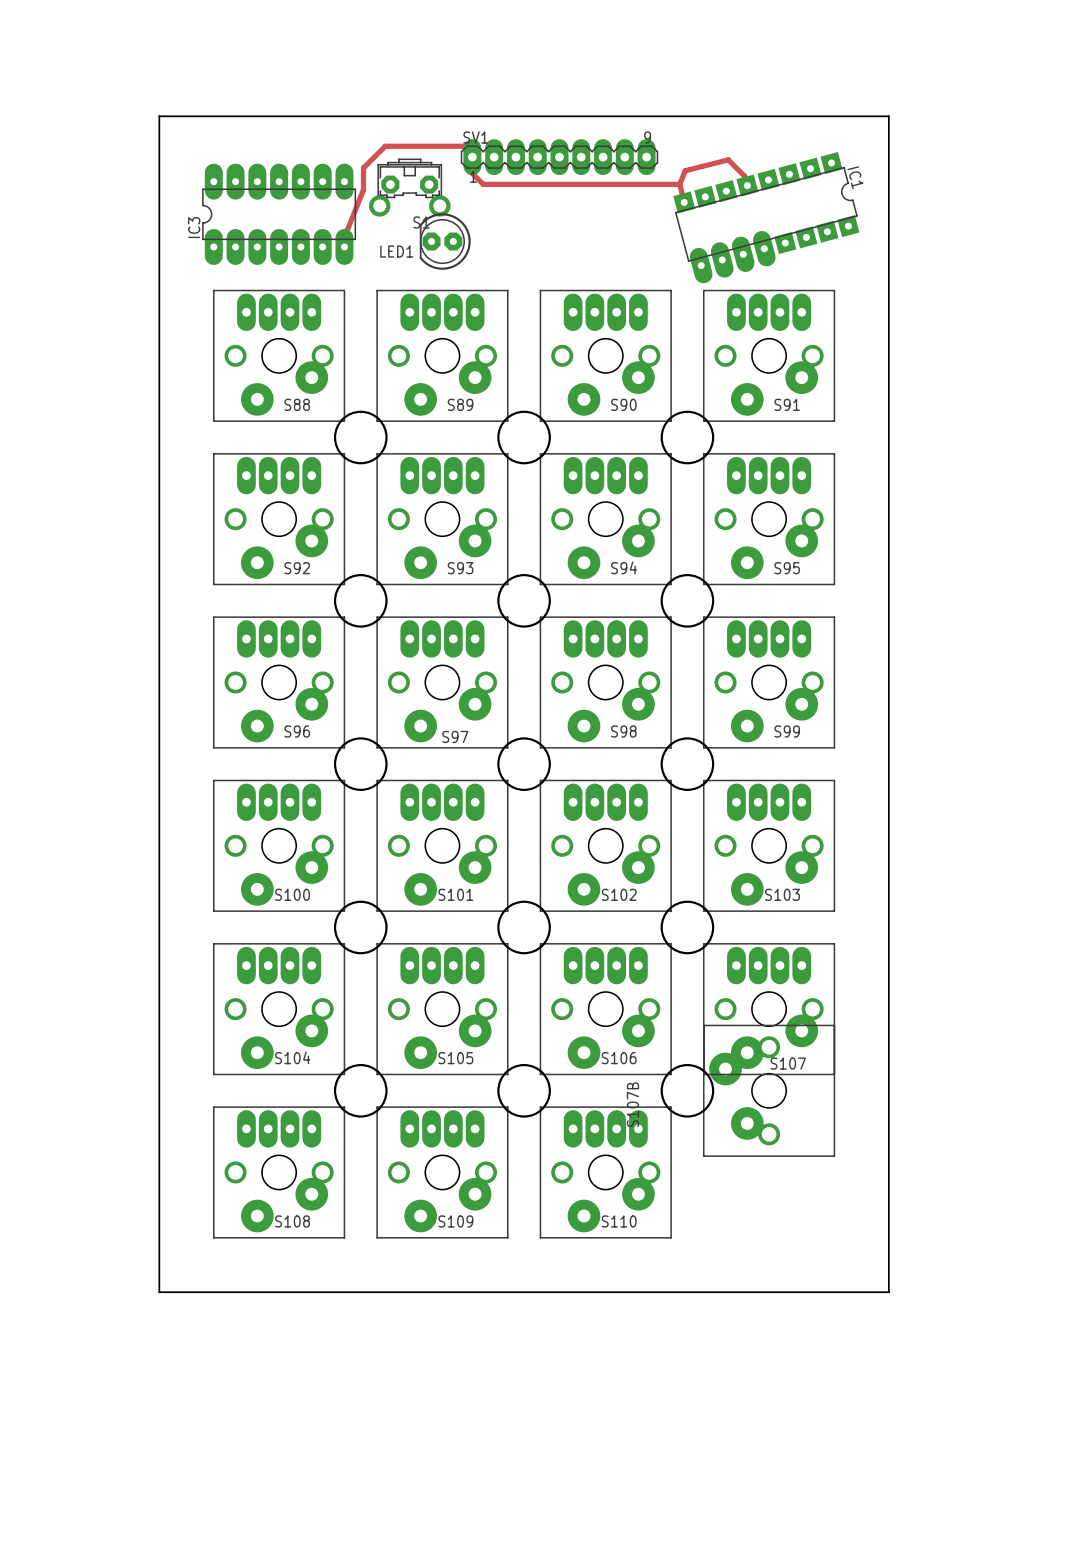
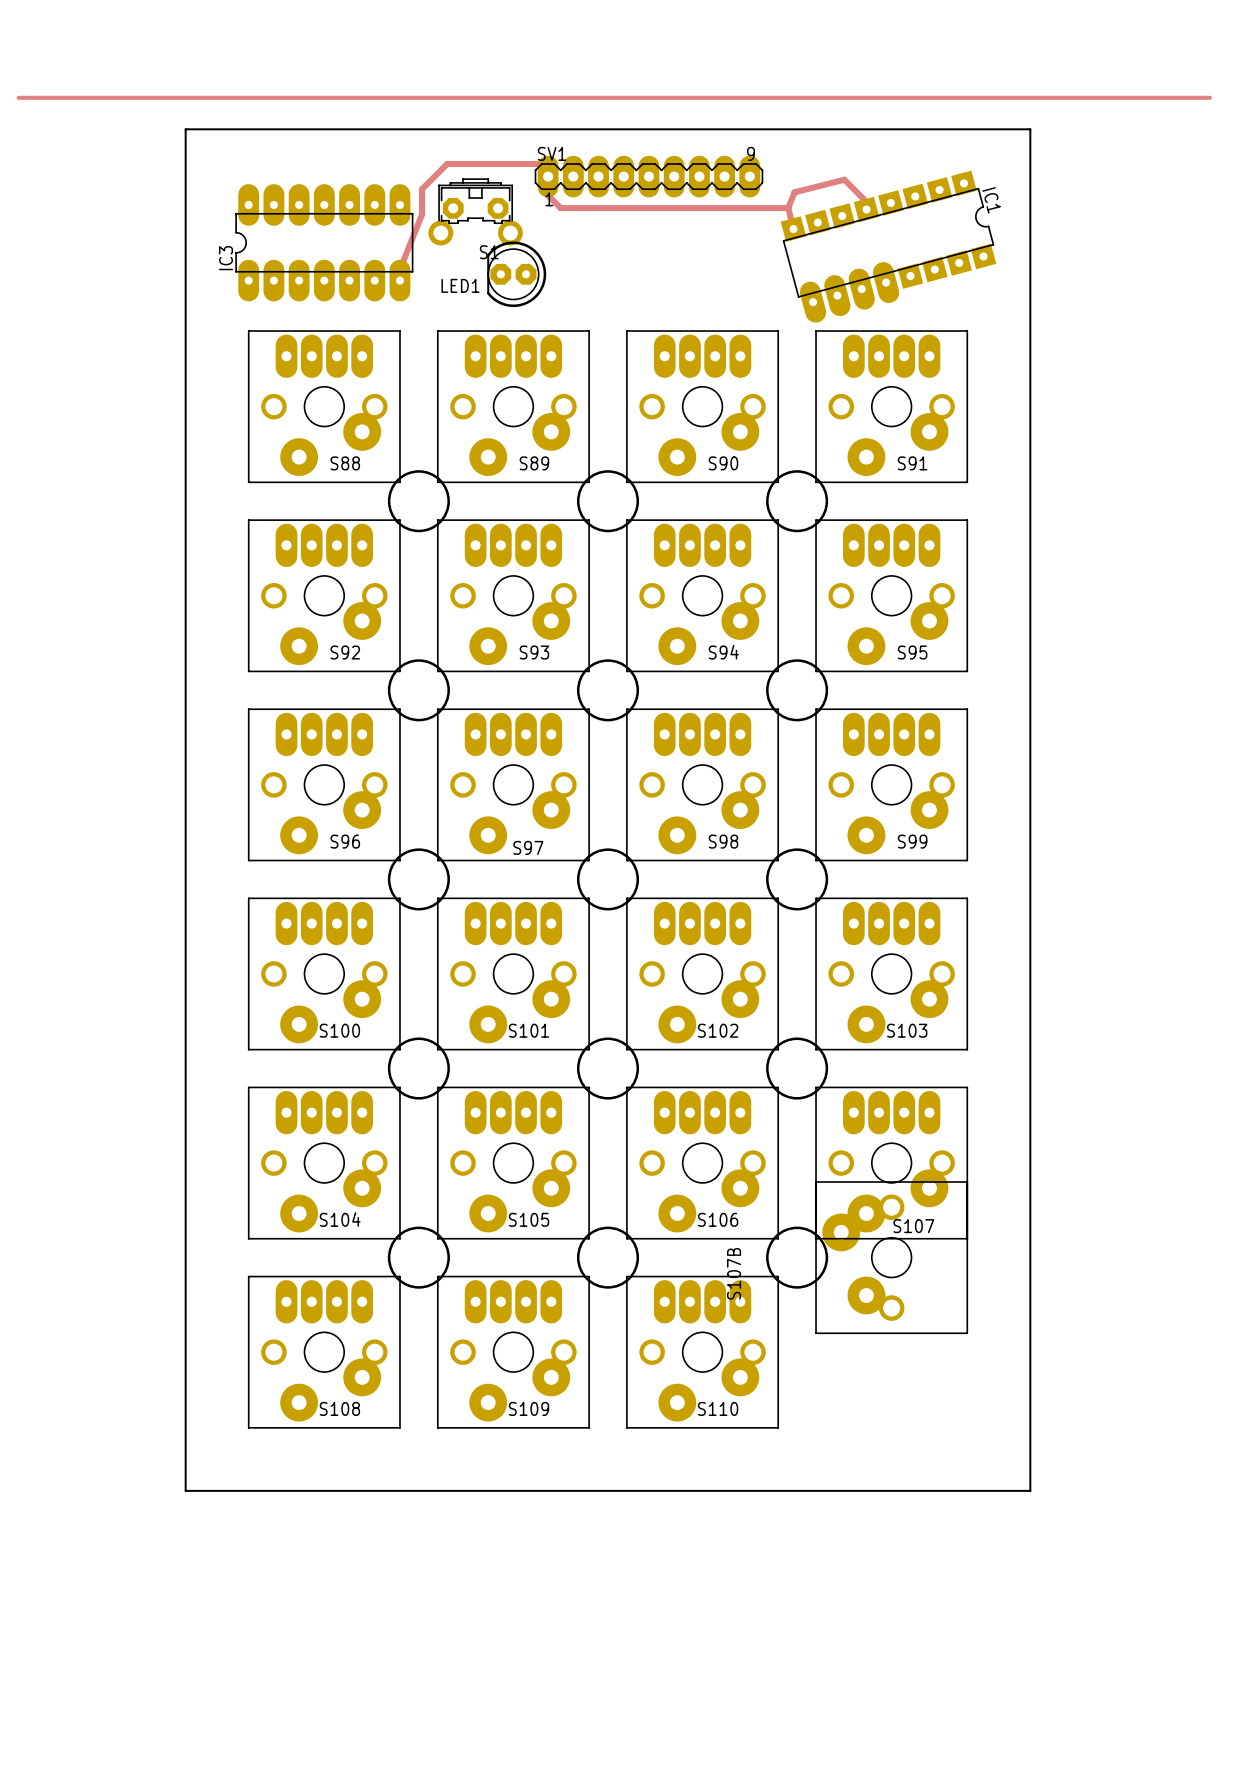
track: none -> (18, 97) (1209, 97)

